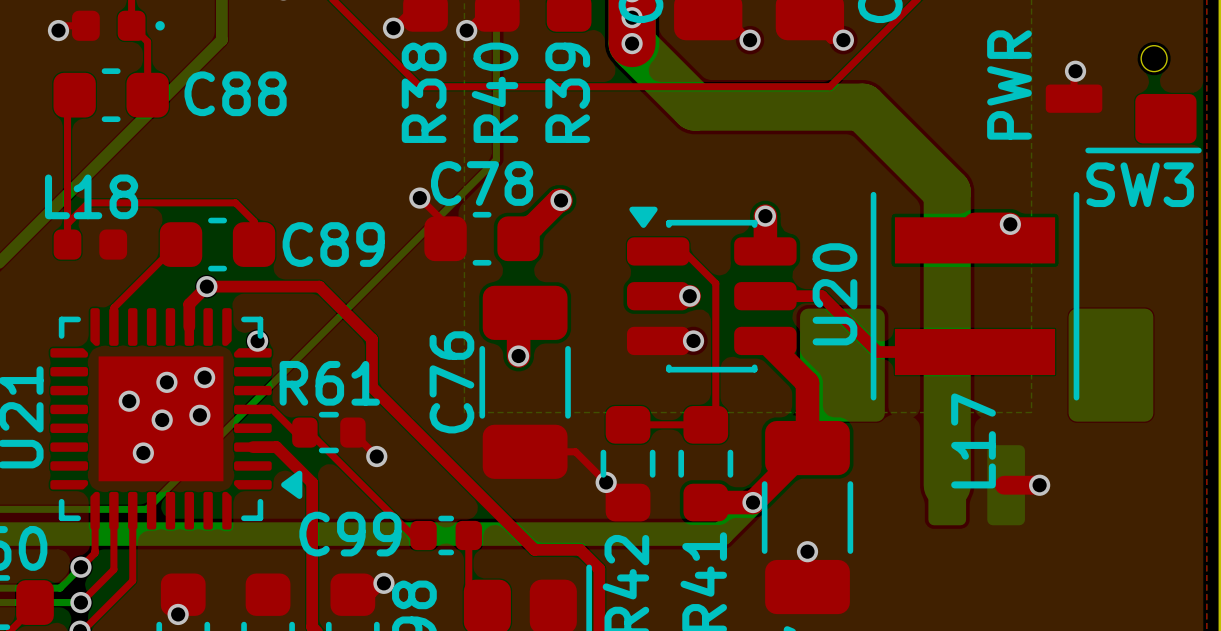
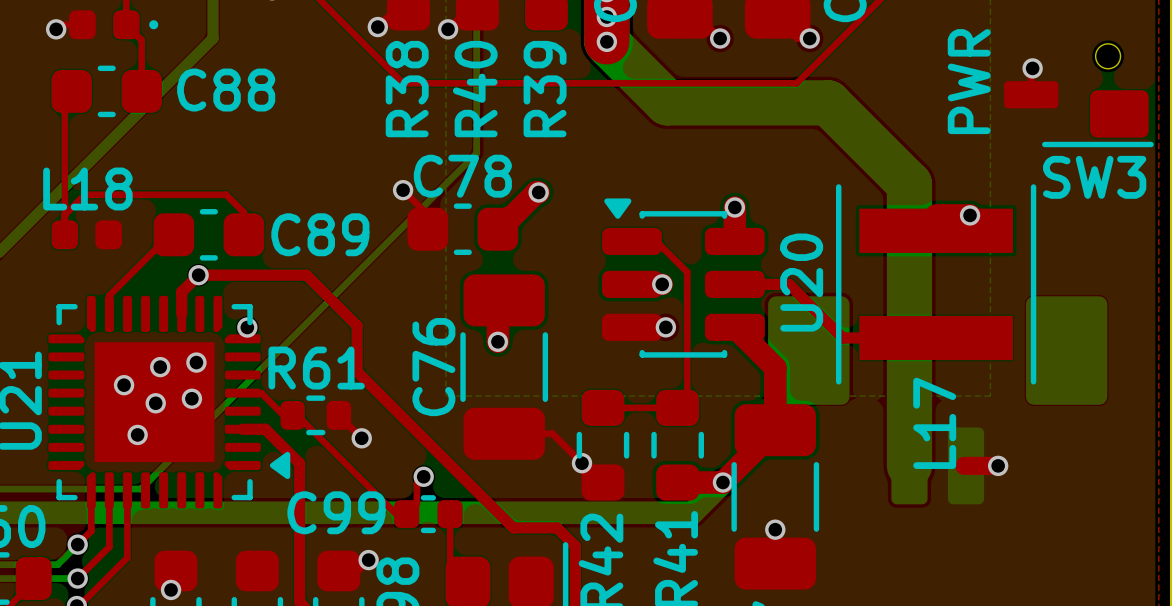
top track: none -> (423, 476) (416, 483) (416, 503)
via: none -> (423, 476)

